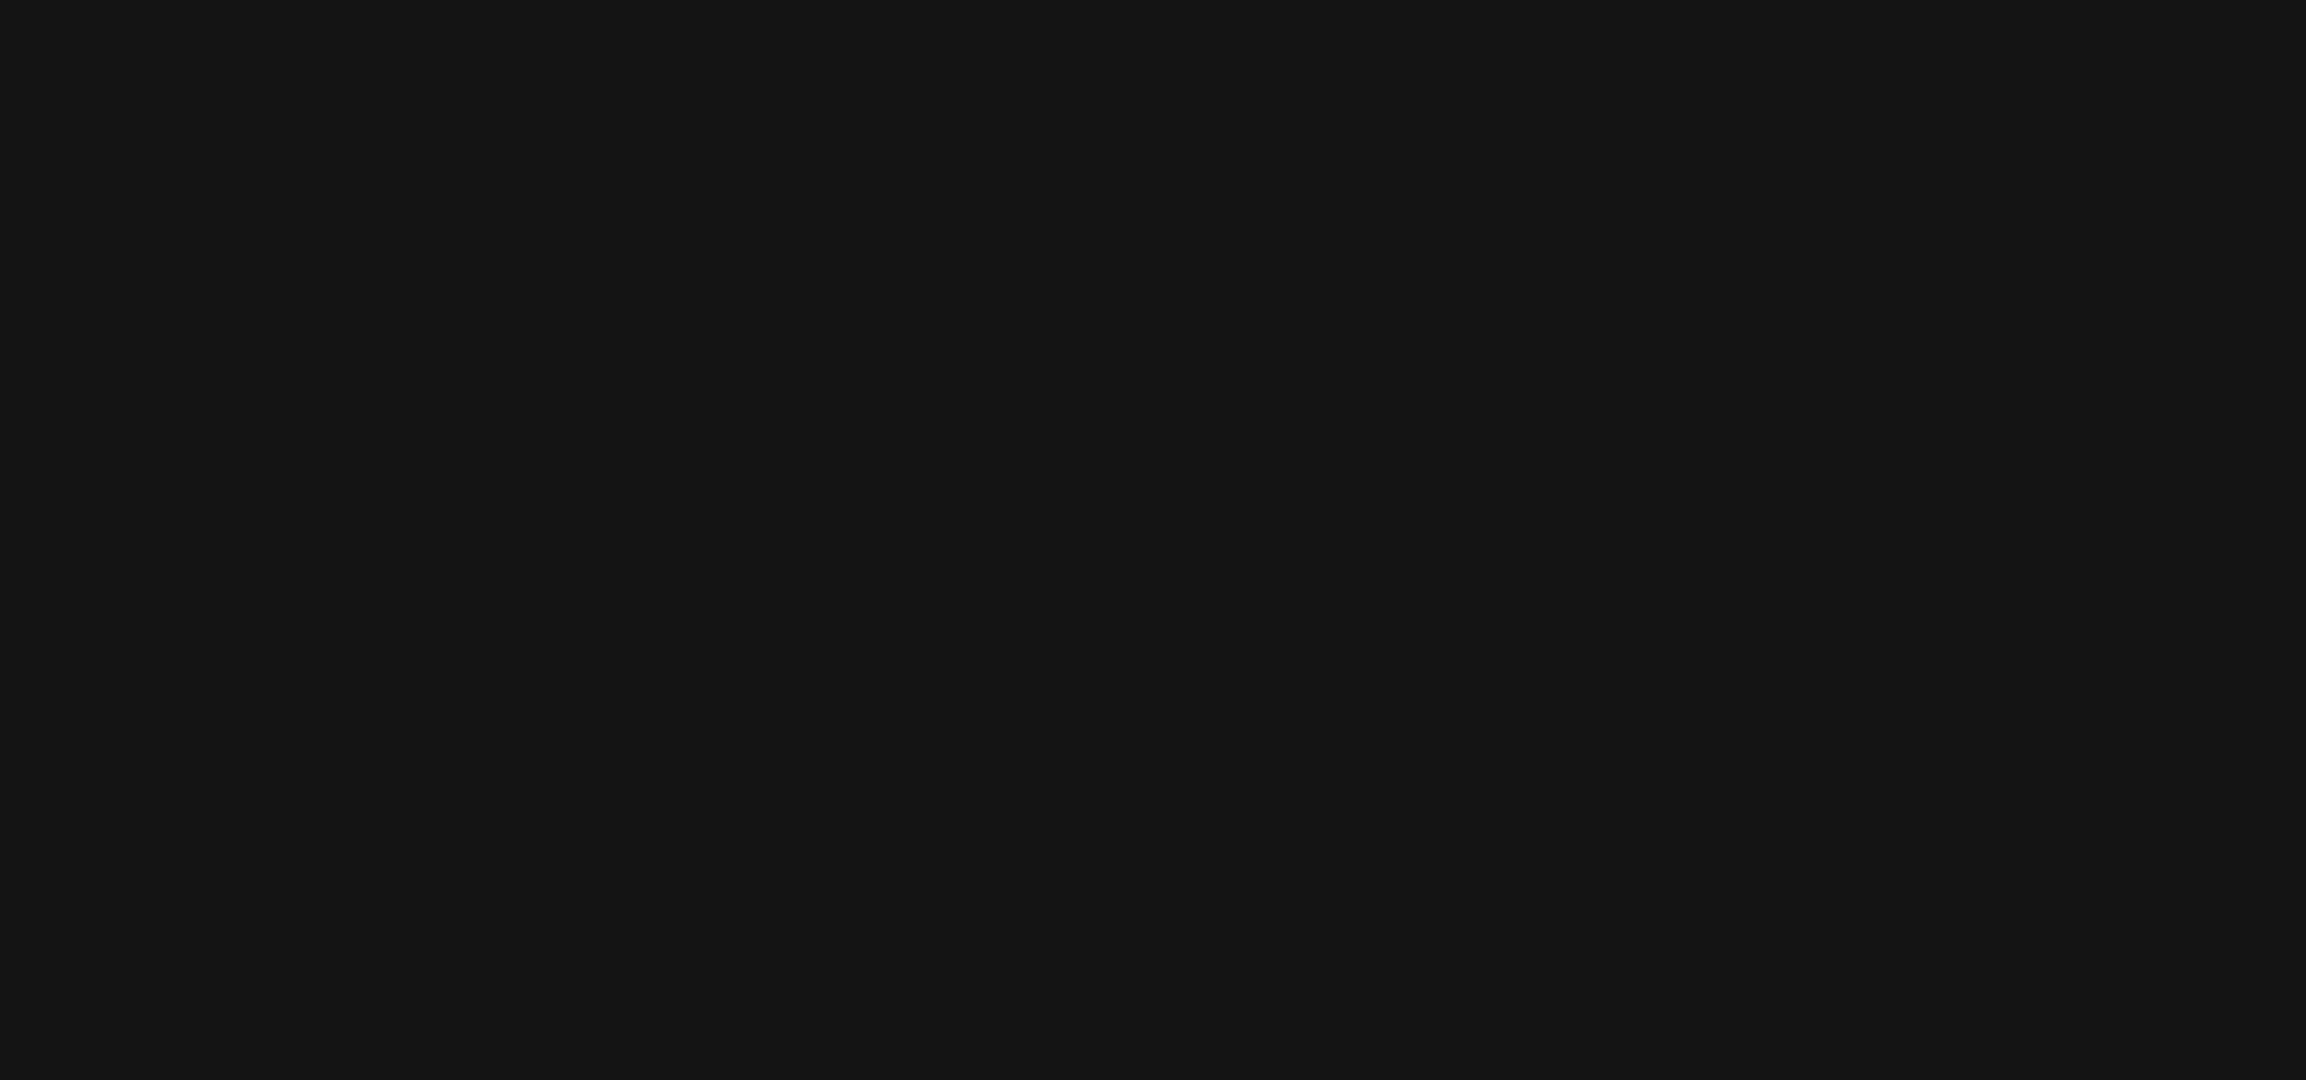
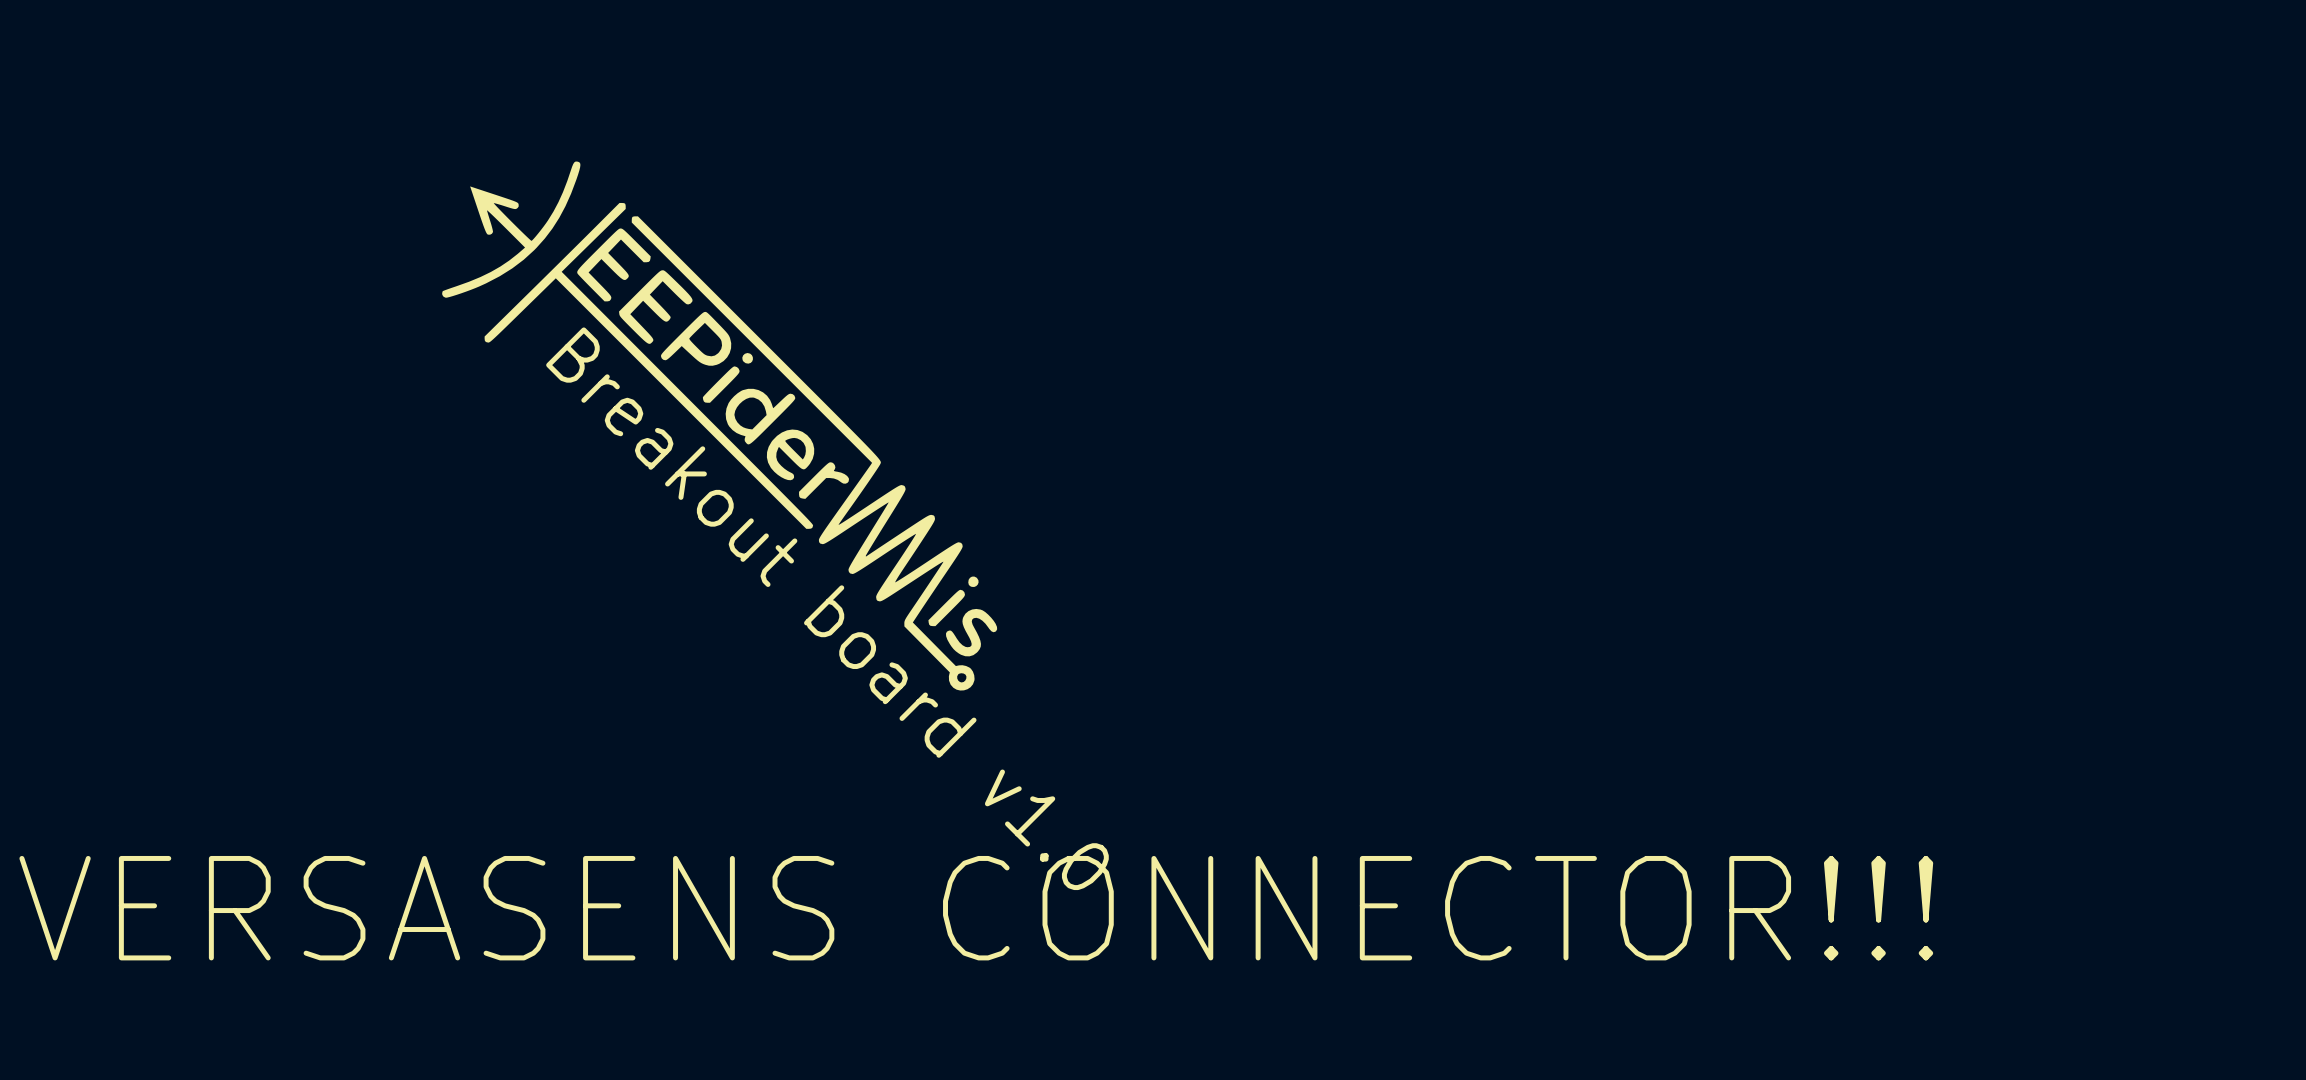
drawing: none -> [442, 161, 998, 691]
text: none -> Breakout board v1.0 (827, 608)
text: none -> VERSASENS CONNECTOR!!! (976, 908)

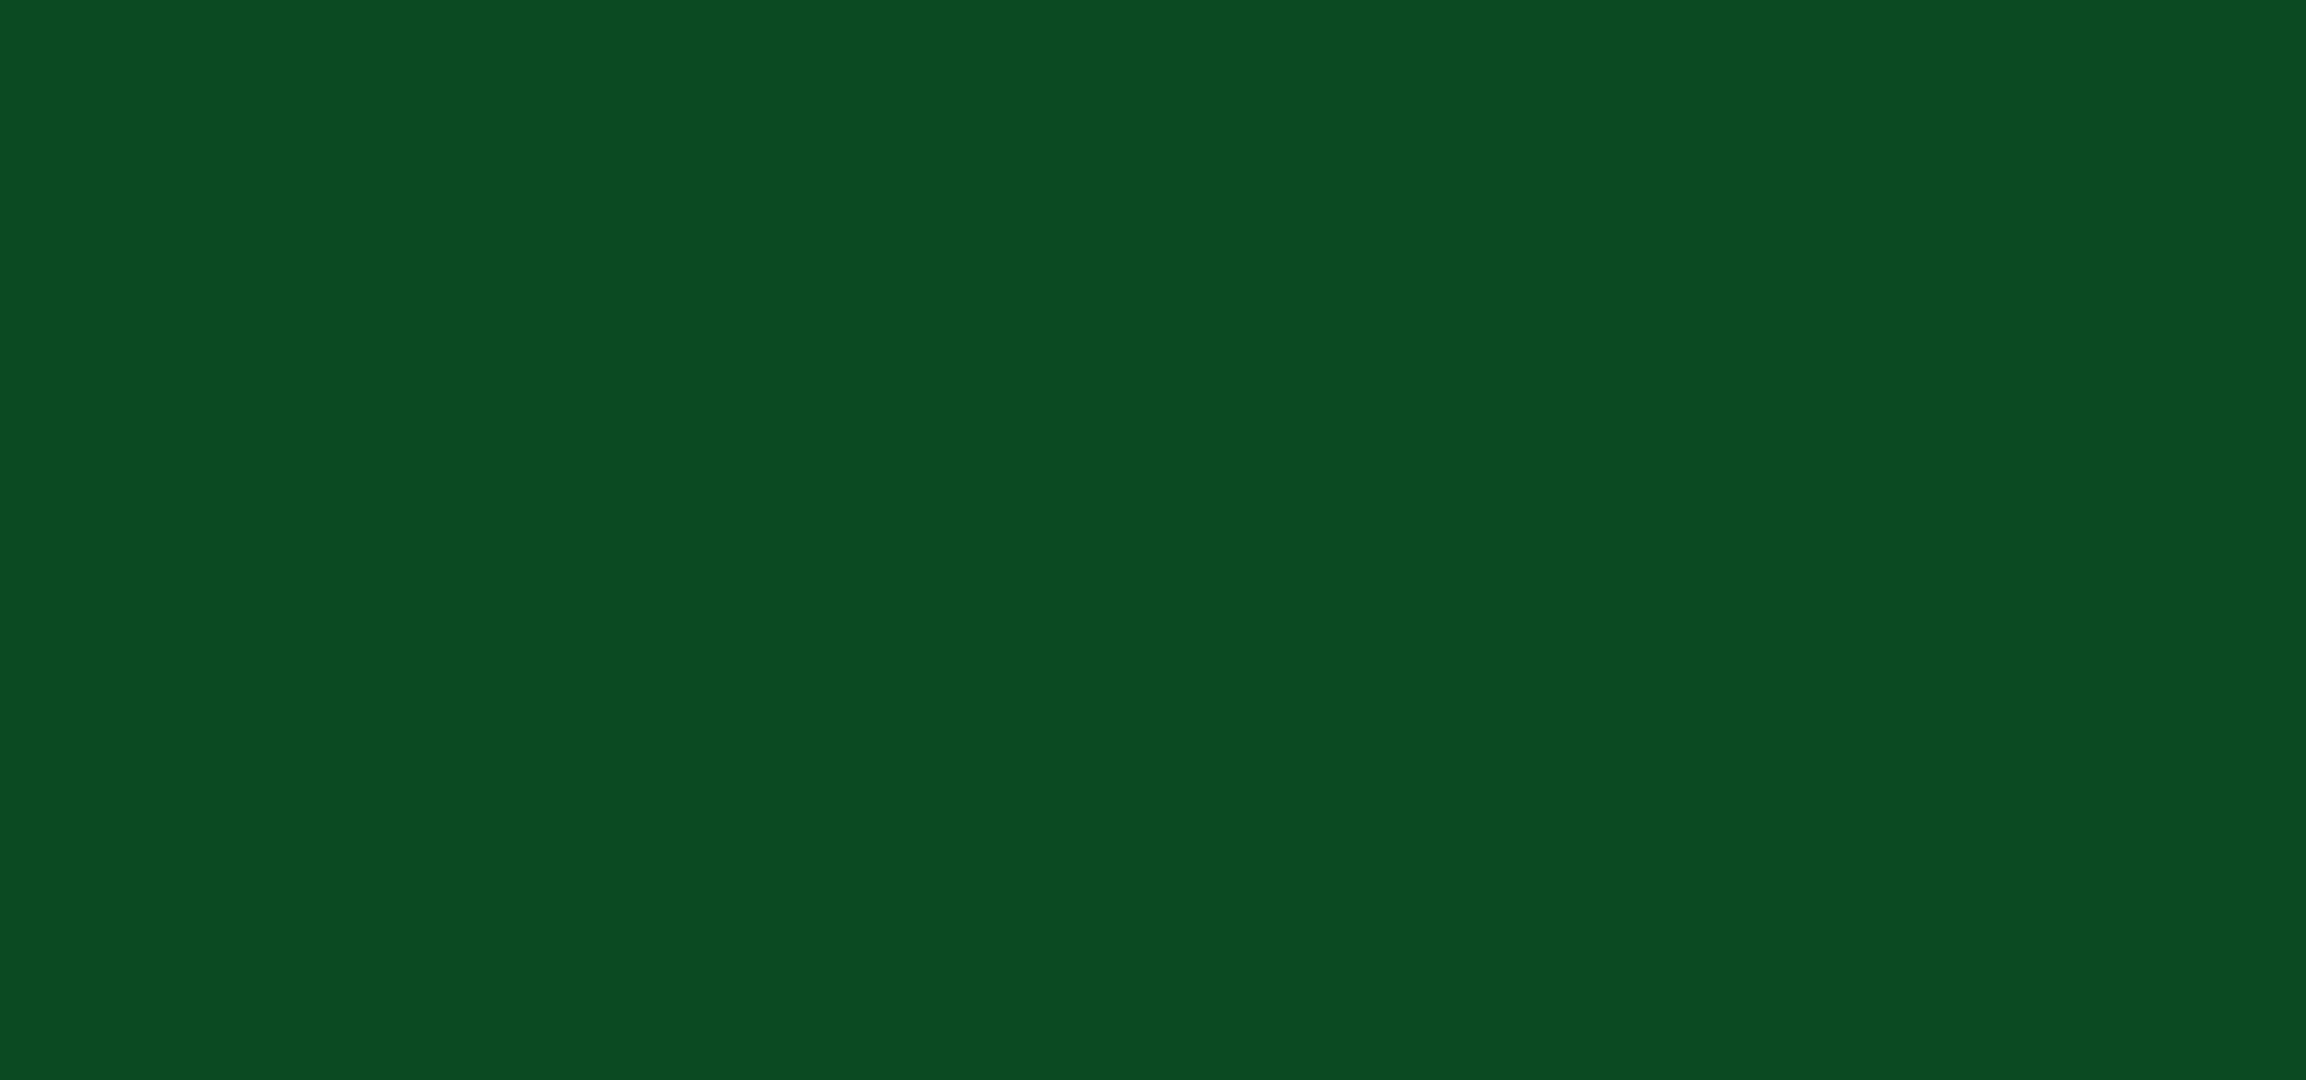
drawing: [442, 161, 998, 691] -> none
text: Breakout board v1.0 (827, 608) -> none
text: VERSASENS CONNECTOR!!! (976, 908) -> none

